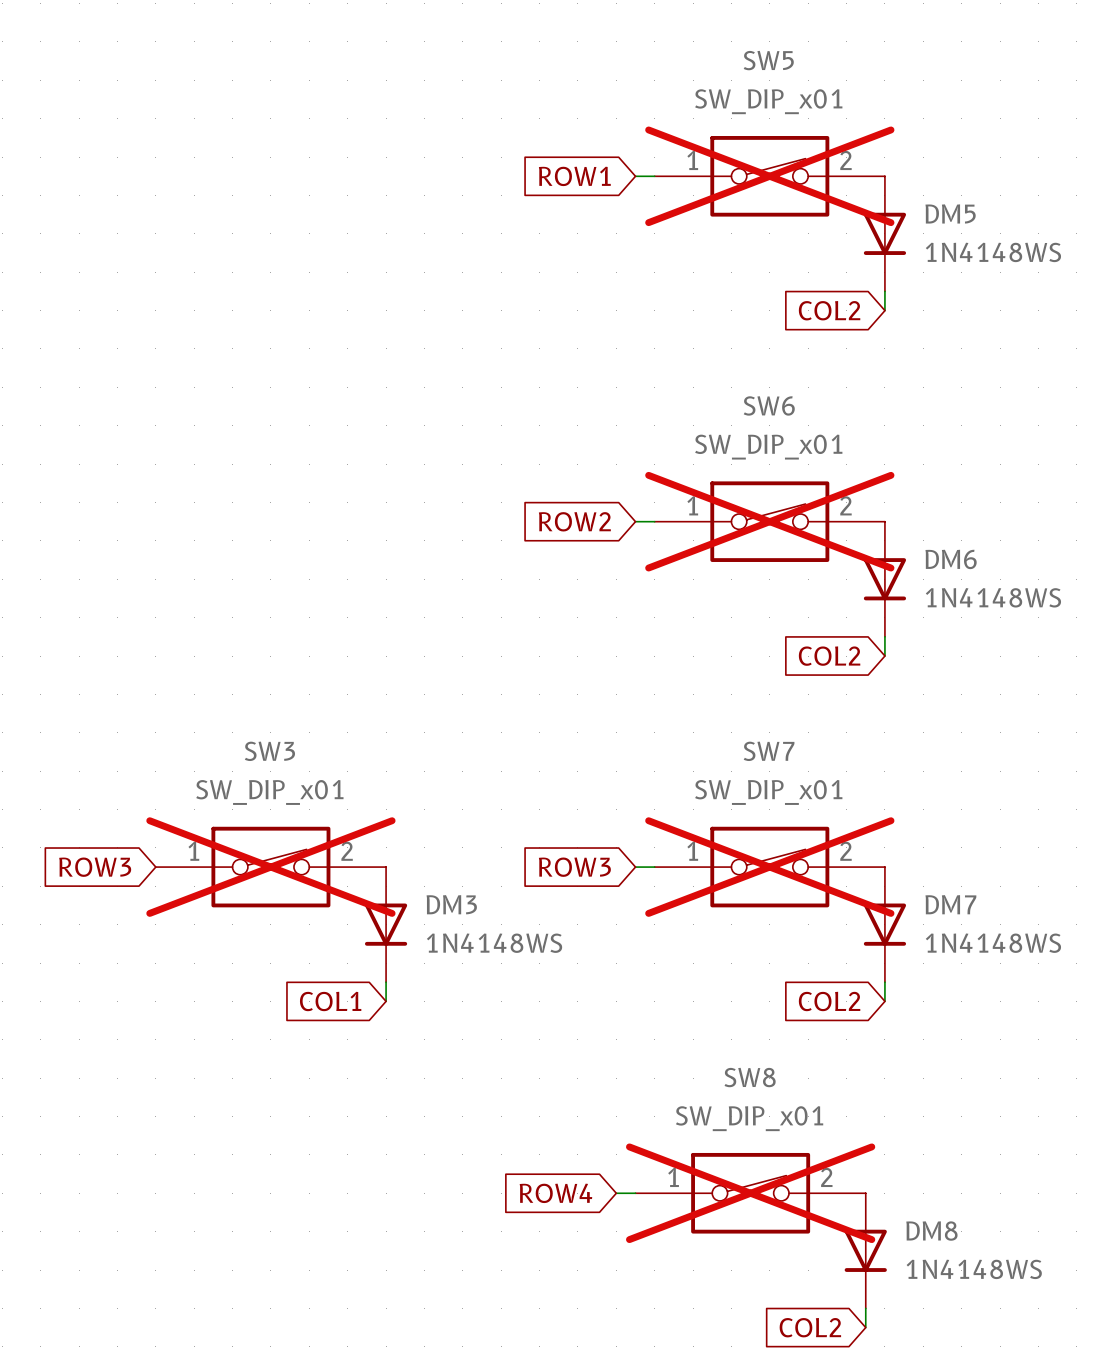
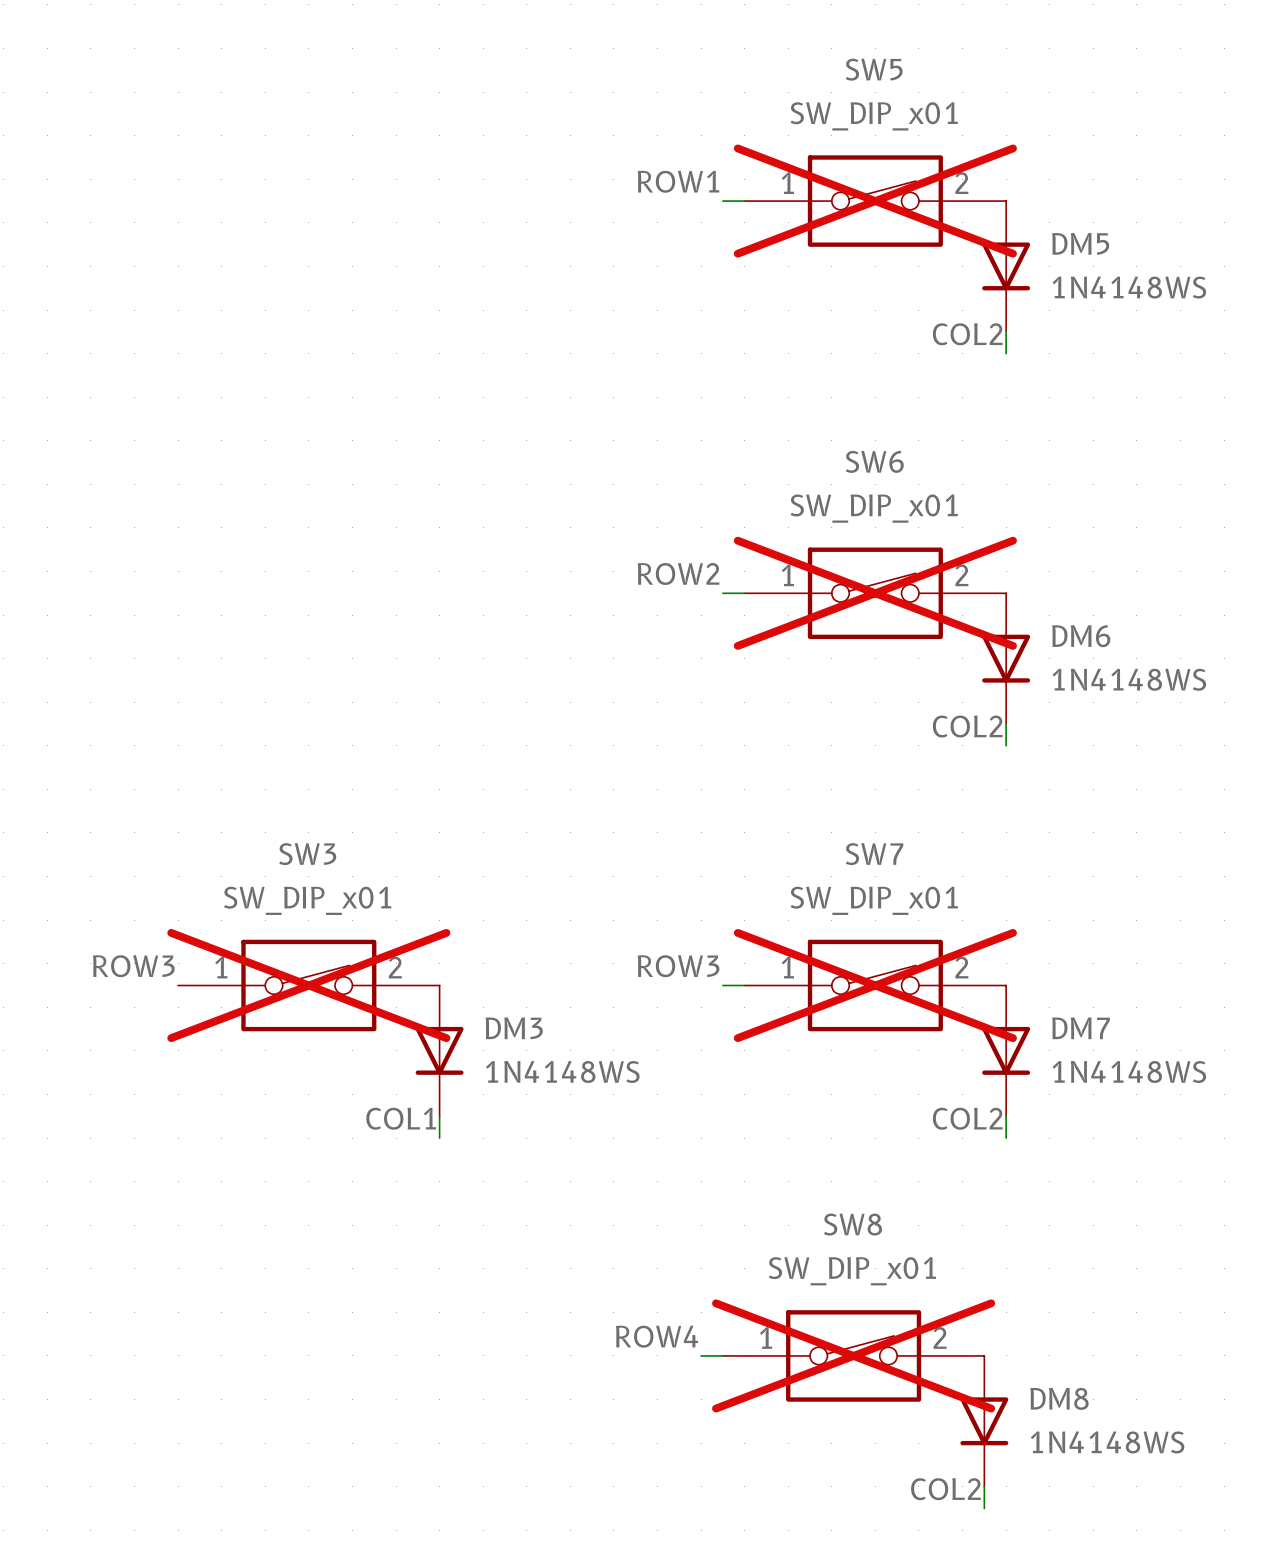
label: none -> ROW1 (678, 181)
global label: ROW1 (574, 176) -> none
label: none -> COL2 (967, 334)
global label: COL2 (829, 310) -> none
label: none -> ROW2 (678, 573)
global label: ROW2 (574, 521) -> none
label: none -> COL2 (967, 726)
global label: COL2 (829, 656) -> none
label: none -> ROW3 (133, 966)
label: none -> ROW3 (678, 966)
global label: ROW3 (95, 867) -> none
global label: ROW3 (574, 867) -> none
label: none -> COL1 (401, 1118)
label: none -> COL2 (967, 1118)
global label: COL1 (330, 1001) -> none
global label: COL2 (829, 1001) -> none
label: none -> ROW4 (657, 1336)
global label: ROW4 (555, 1193) -> none
label: none -> COL2 (945, 1489)
global label: COL2 (810, 1327) -> none

